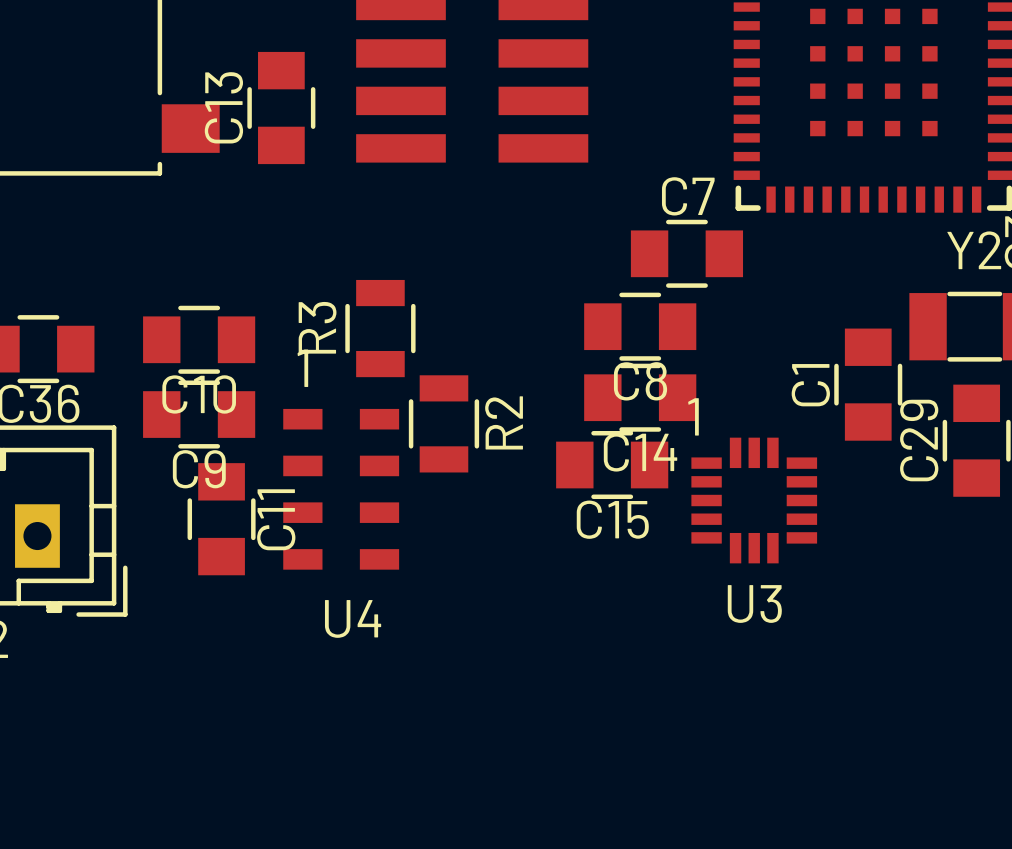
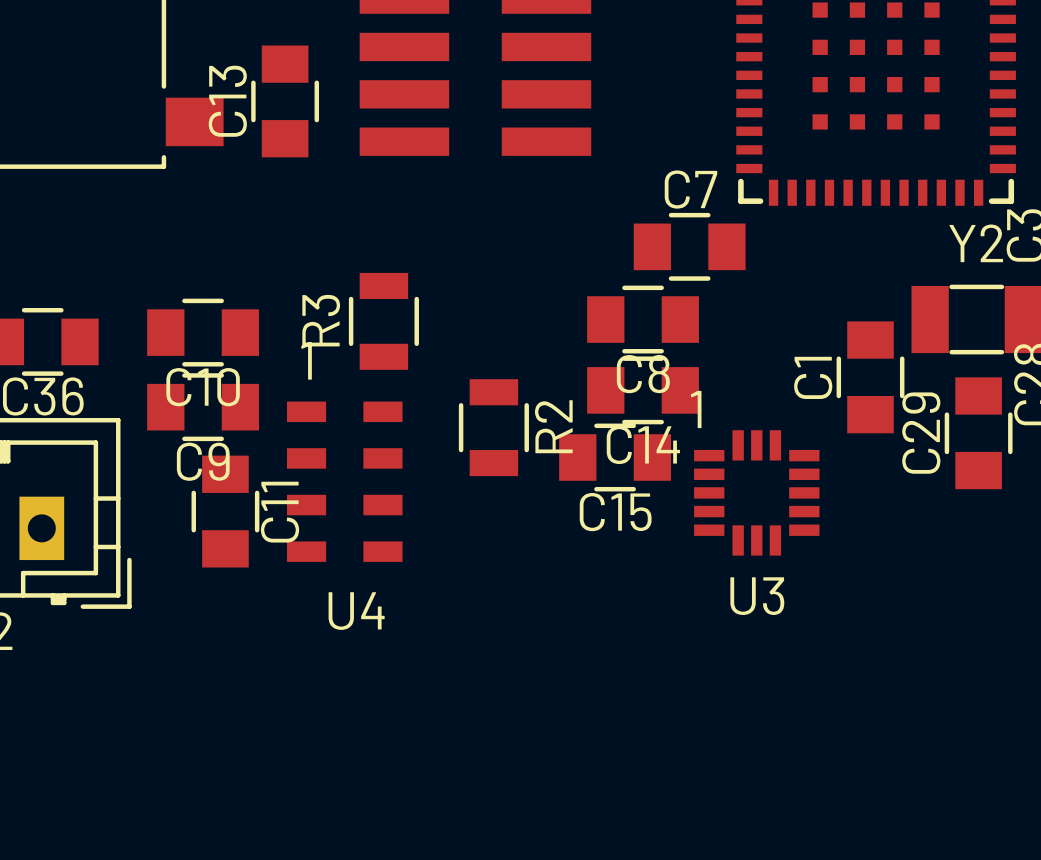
R2 position: (443, 423) -> (493, 427)

